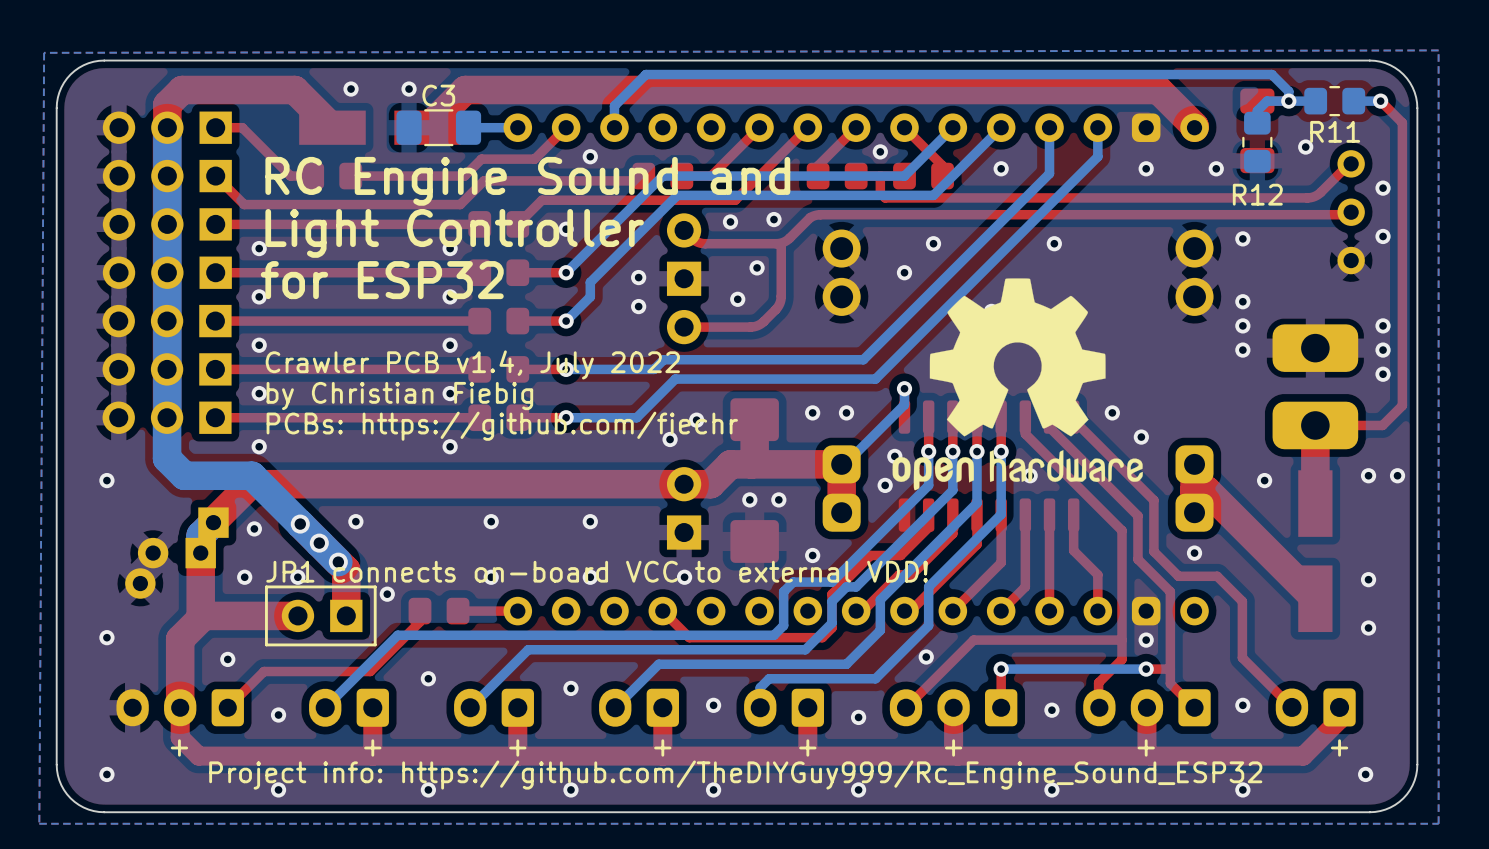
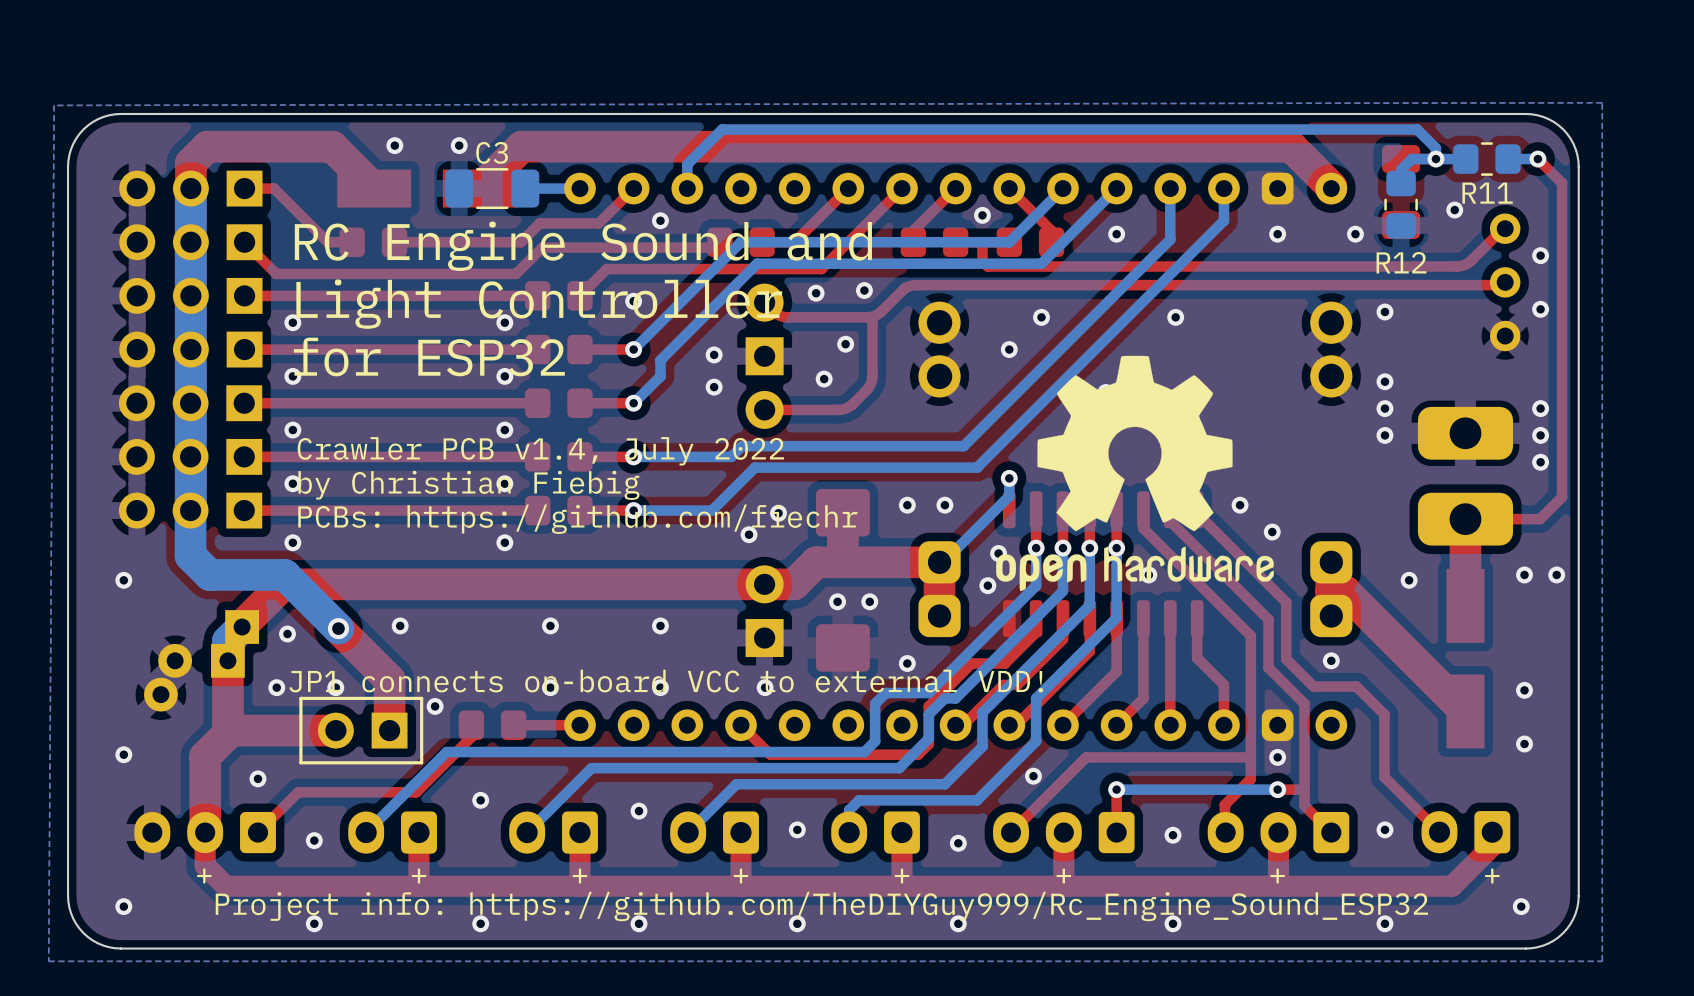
bottom track: (300, 524) (338, 562) -> none
via: (319, 543) -> none
via: (338, 562) -> none

